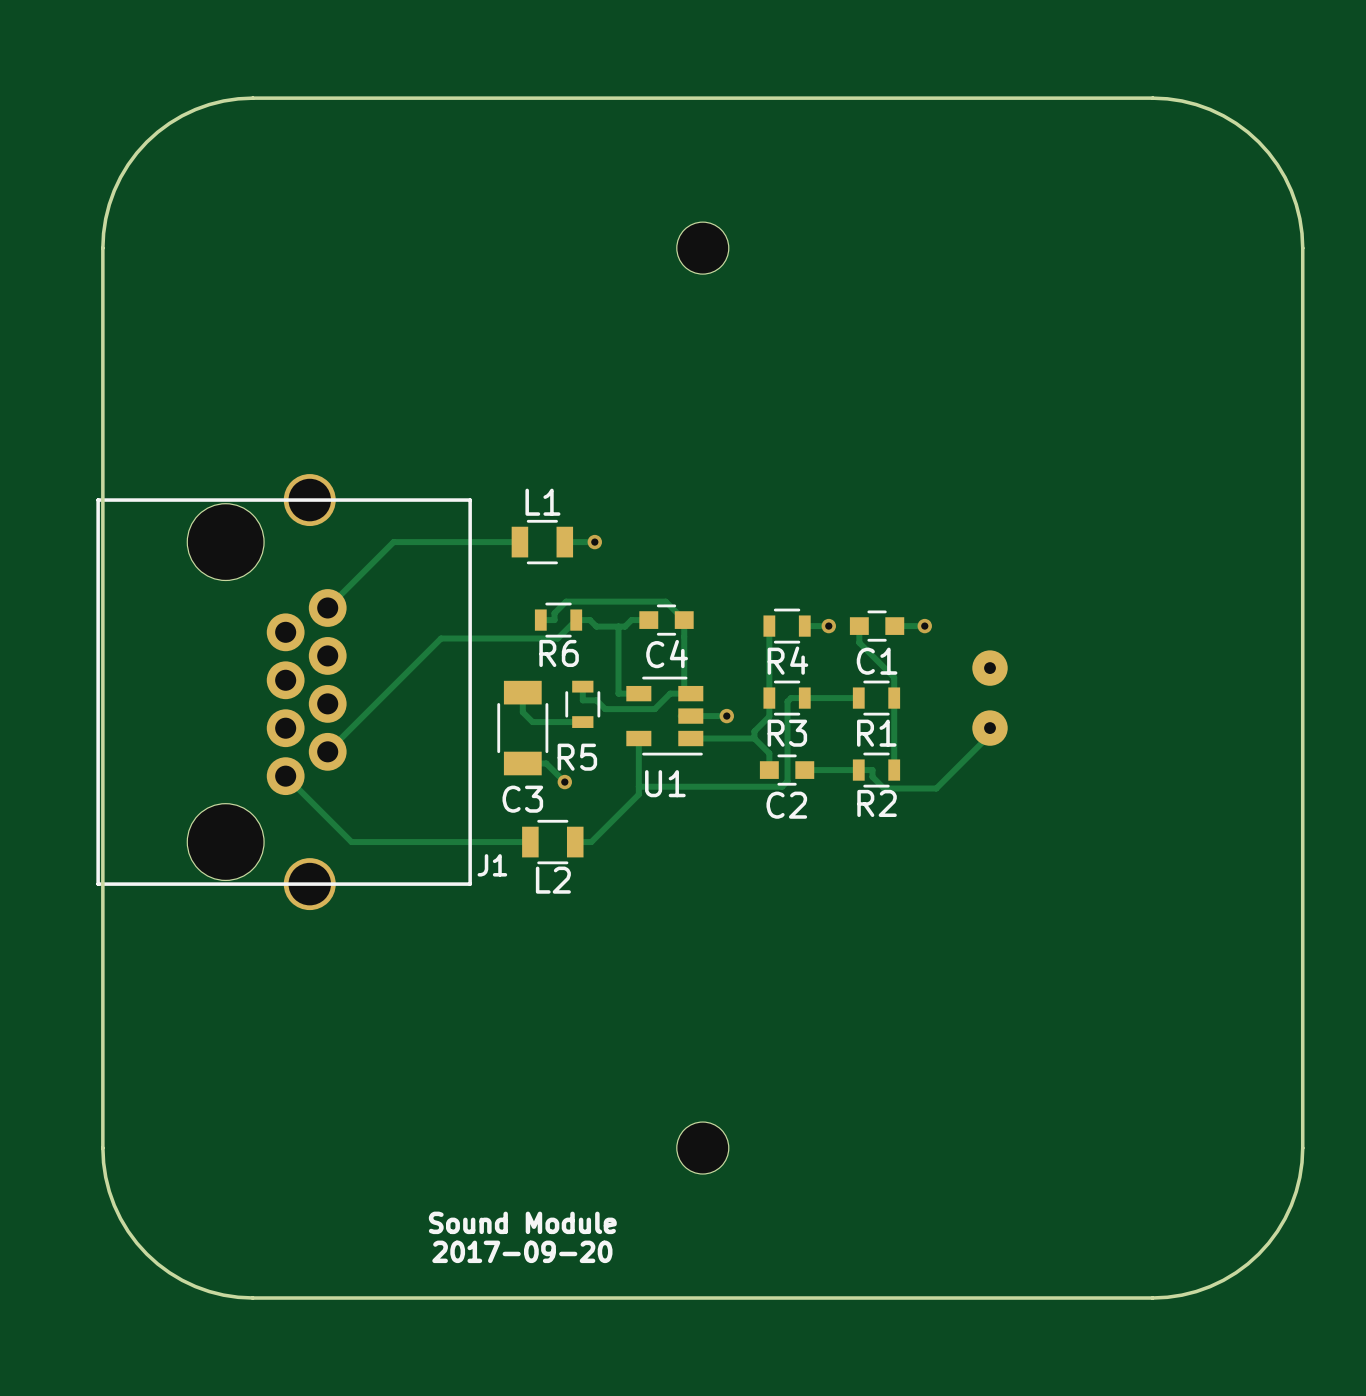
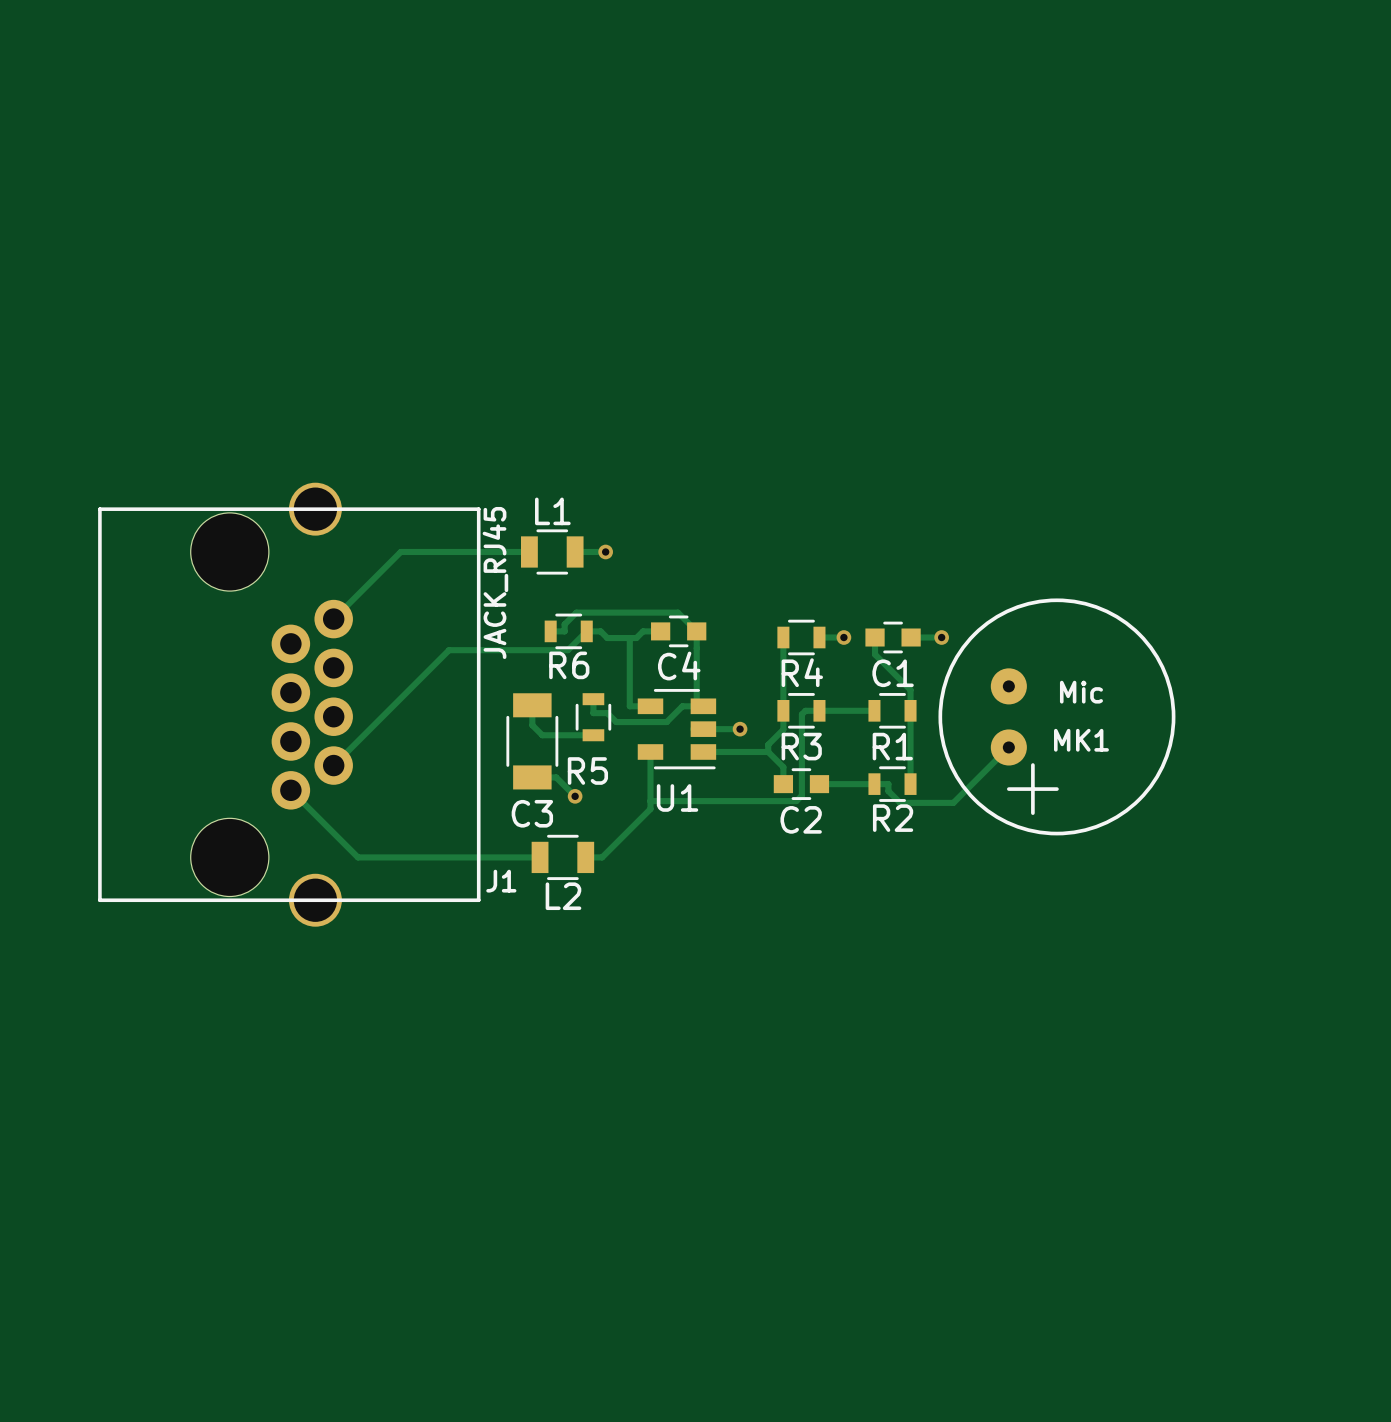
board edge: (252, 98) (1167, 98) (1196, 104) (1223, 115) (1247, 132) (1268, 152) (1285, 177) (1296, 204) (1302, 248) (1302, 1148) (1296, 1191) (1285, 1218) (1268, 1243) (1247, 1263) (1223, 1280) (1196, 1291) (1152, 1298) (252, 1298) (209, 1291) (182, 1280) (157, 1263) (136, 1243) (120, 1218) (109, 1191) (102, 1148) (103, 233) (109, 204) (120, 177) (136, 152) (157, 132) (182, 115) (209, 104) (252, 98) -> none
part: (702, 248) -> none
J1 value: none -> JACK_RJ45 (495, 582)
MK1 side: bottom (990, 698) -> top (1056, 716)
part: (702, 1148) -> none
text: Sound Module (522, 1222) -> none
text: 2017-09-20 (522, 1251) -> none

